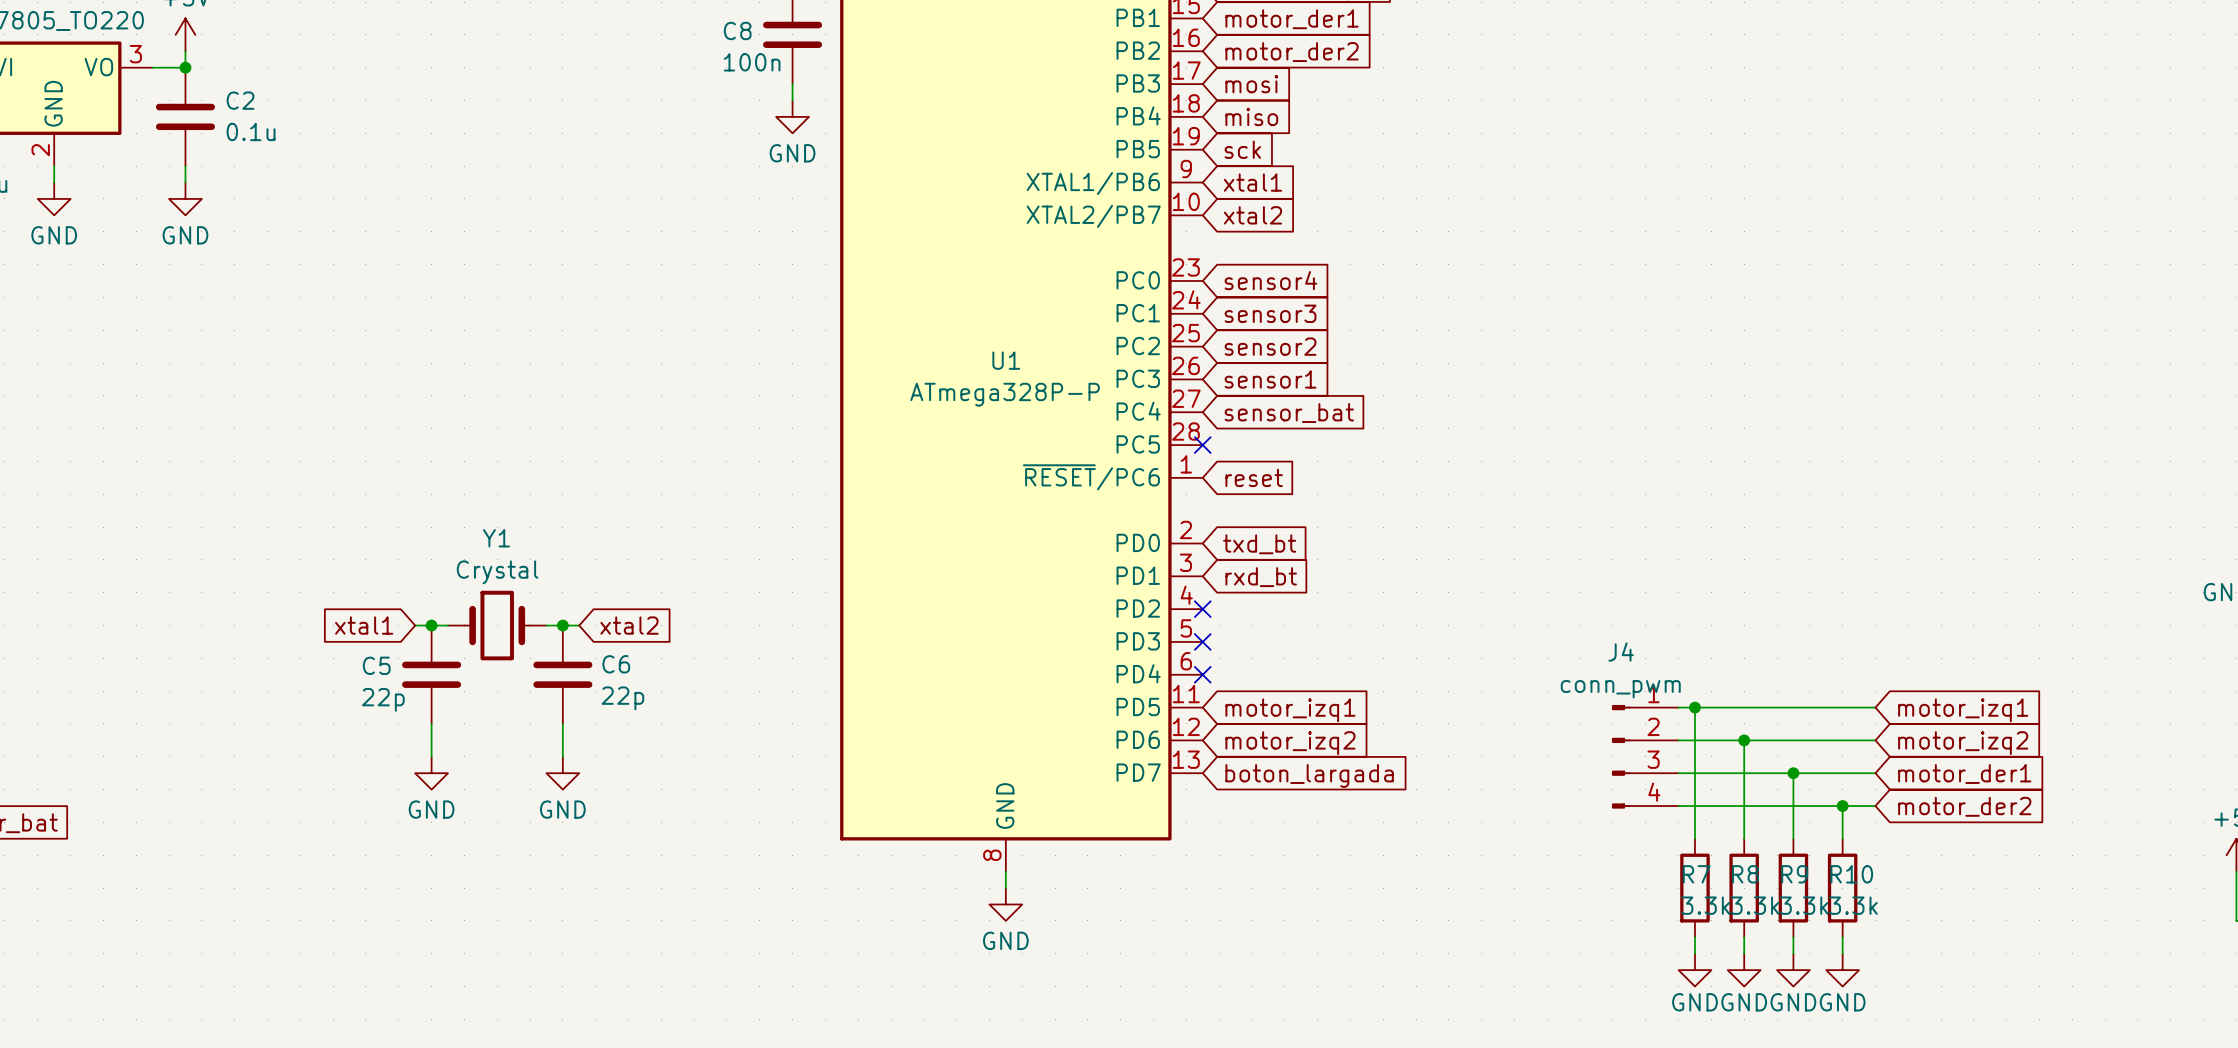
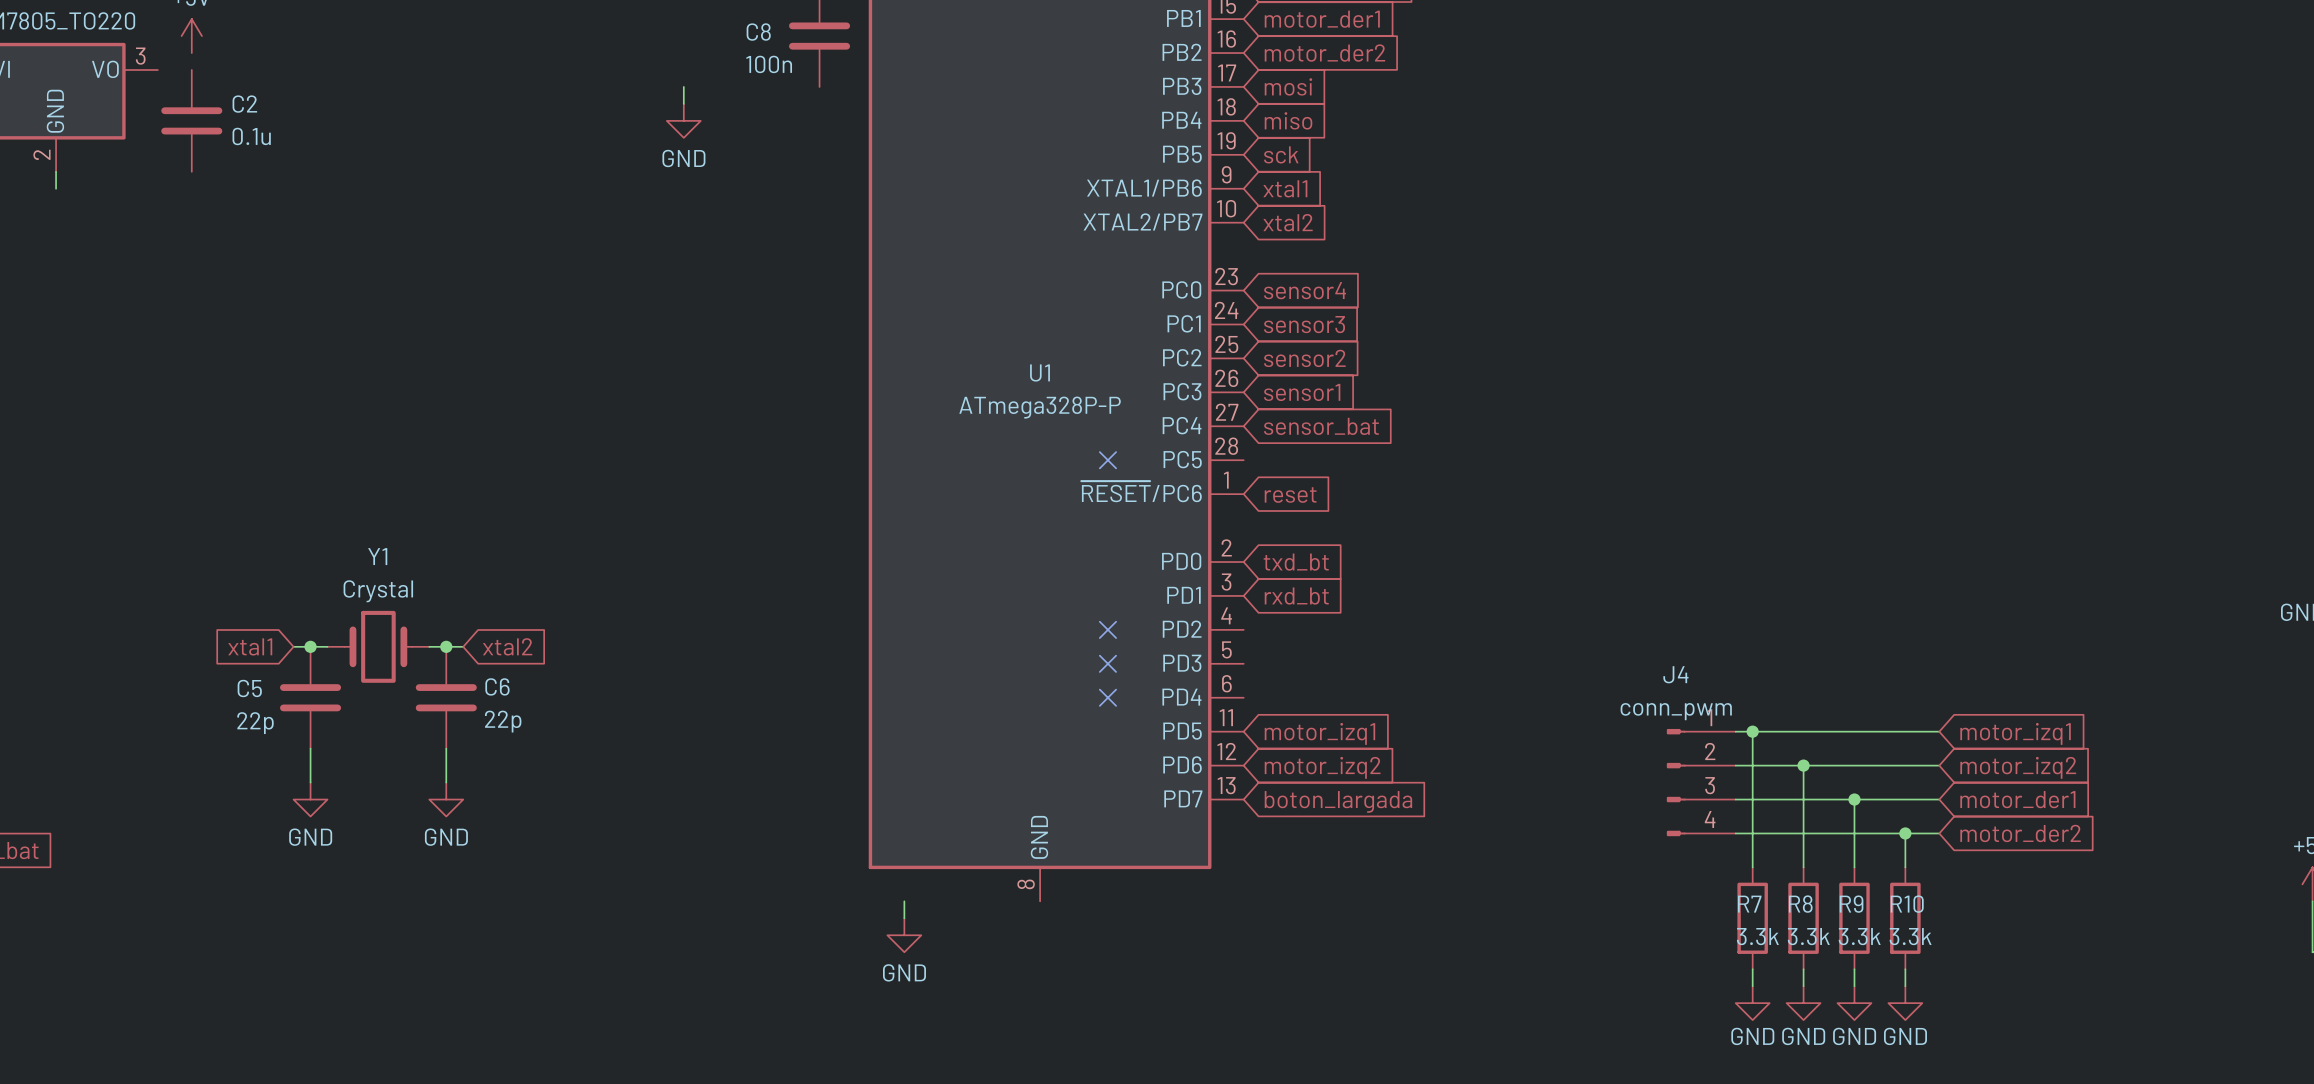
wire: (185, 51) (185, 67) (152, 67) -> none
junction: (185, 67) -> none
wire: (792, 84) (792, 100) -> (683, 86) (683, 103)
power symbol: none -> GND (683, 120)
power symbol: GND (792, 116) -> none
wire: (185, 166) (185, 182) -> none
power symbol: GND (54, 198) -> none
power symbol: GND (185, 198) -> none
no-connect mark: none -> (1107, 460)
no-connect mark: (1202, 445) -> none
no-connect mark: none -> (1107, 629)
no-connect mark: (1202, 609) -> none
junction: none -> (310, 646)
global label position: xtal1 (364, 625) -> xtal1 (250, 646)
Y1 position: (497, 625) -> (378, 646)
wire: (546, 625) (579, 625) -> (293, 646) (327, 646)
junction: (562, 625) -> none
global label position: xtal2 (629, 625) -> xtal2 (507, 646)
no-connect mark: none -> (1107, 663)
no-connect mark: (1202, 641) -> none
C5 name: C5 (376, 665) -> C6 (497, 686)
C5: none -> 22p (310, 697)
C6: 22p (562, 674) -> none
no-connect mark: none -> (1107, 697)
no-connect mark: (1202, 674) -> none
C5 value position: 22p (383, 699) -> 22p (503, 721)
wire: (562, 723) (562, 756) -> (310, 748) (310, 782)
power symbol: none -> GND (310, 799)
power symbol: GND (562, 773) -> none
wire: (1005, 871) (1005, 888) -> (904, 901) (904, 918)
power symbol position: GND (1005, 904) -> GND (904, 935)

